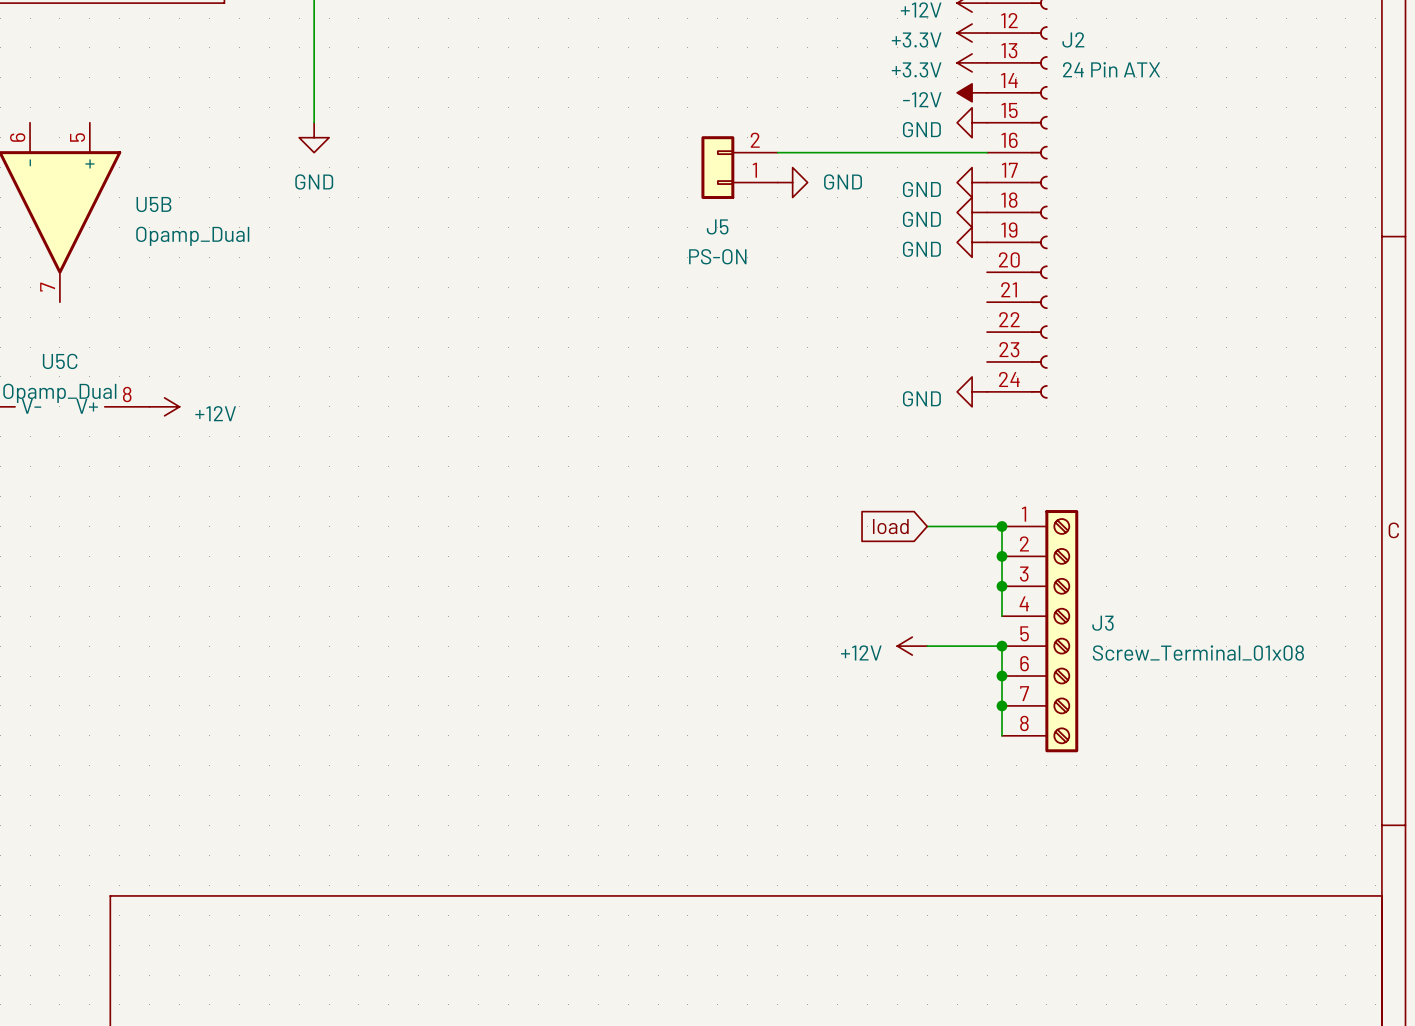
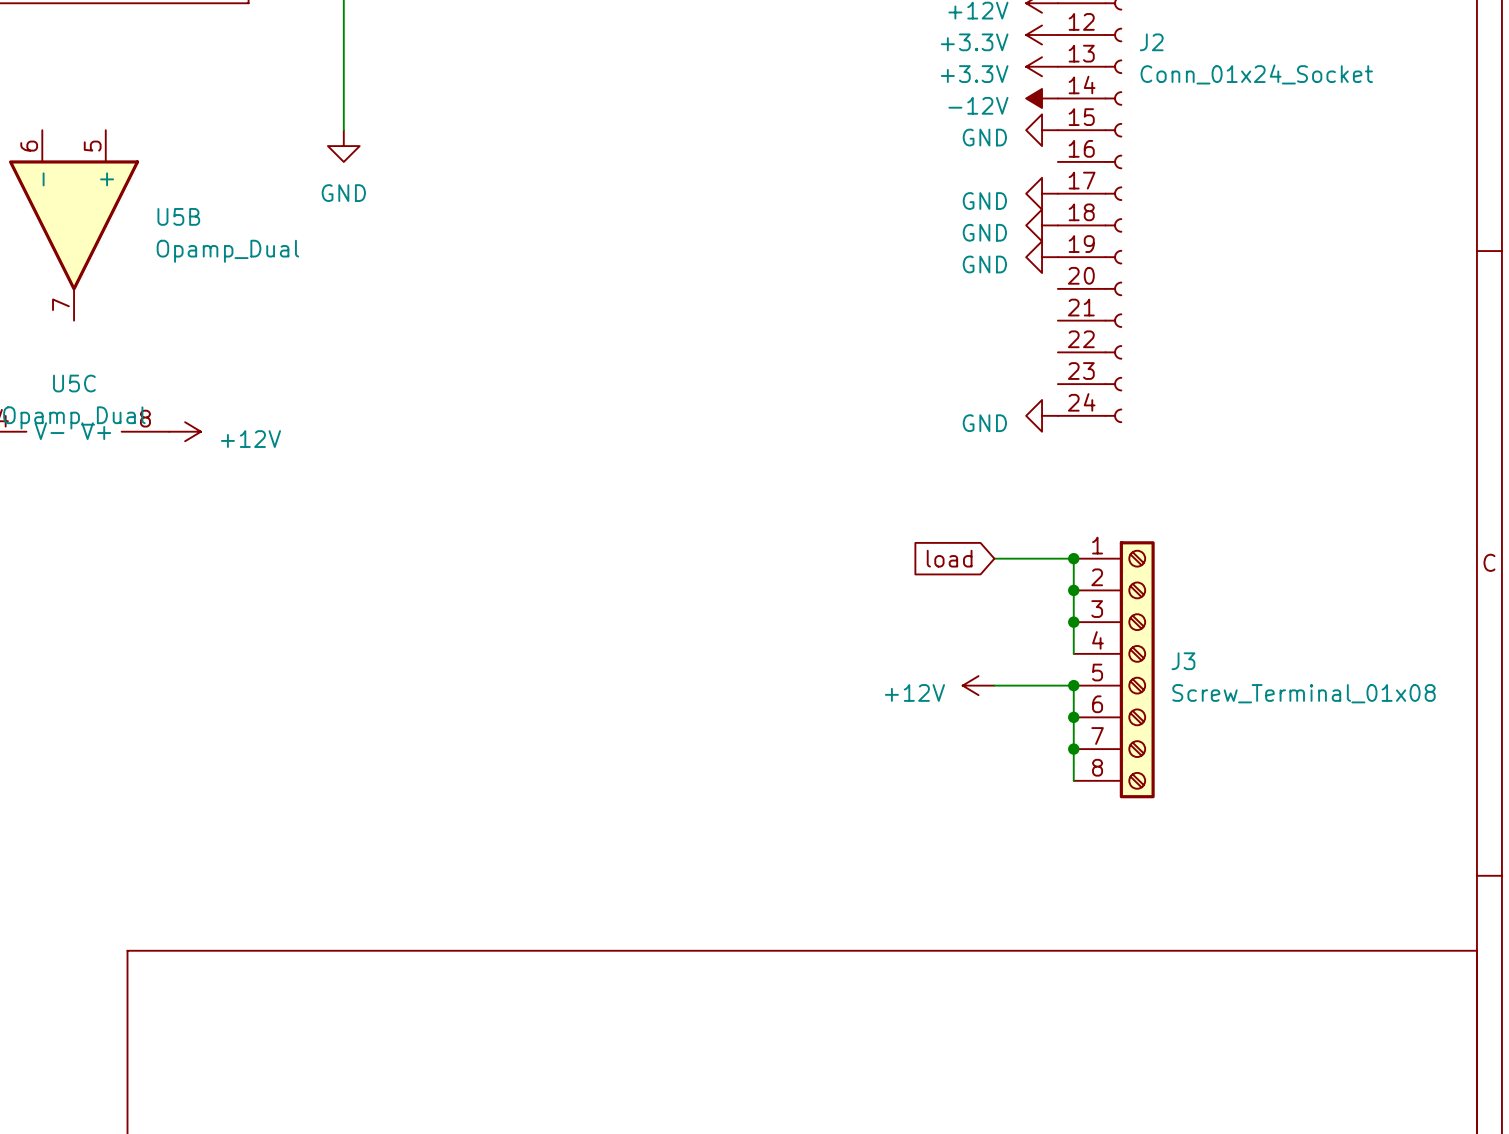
J2 value: 24 Pin ATX (1111, 69) -> Conn_01x24_Socket (1256, 74)
wire: (777, 152) (987, 152) -> none
J5: PS-ON (739, 167) -> none
power symbol: GND (792, 182) -> none

